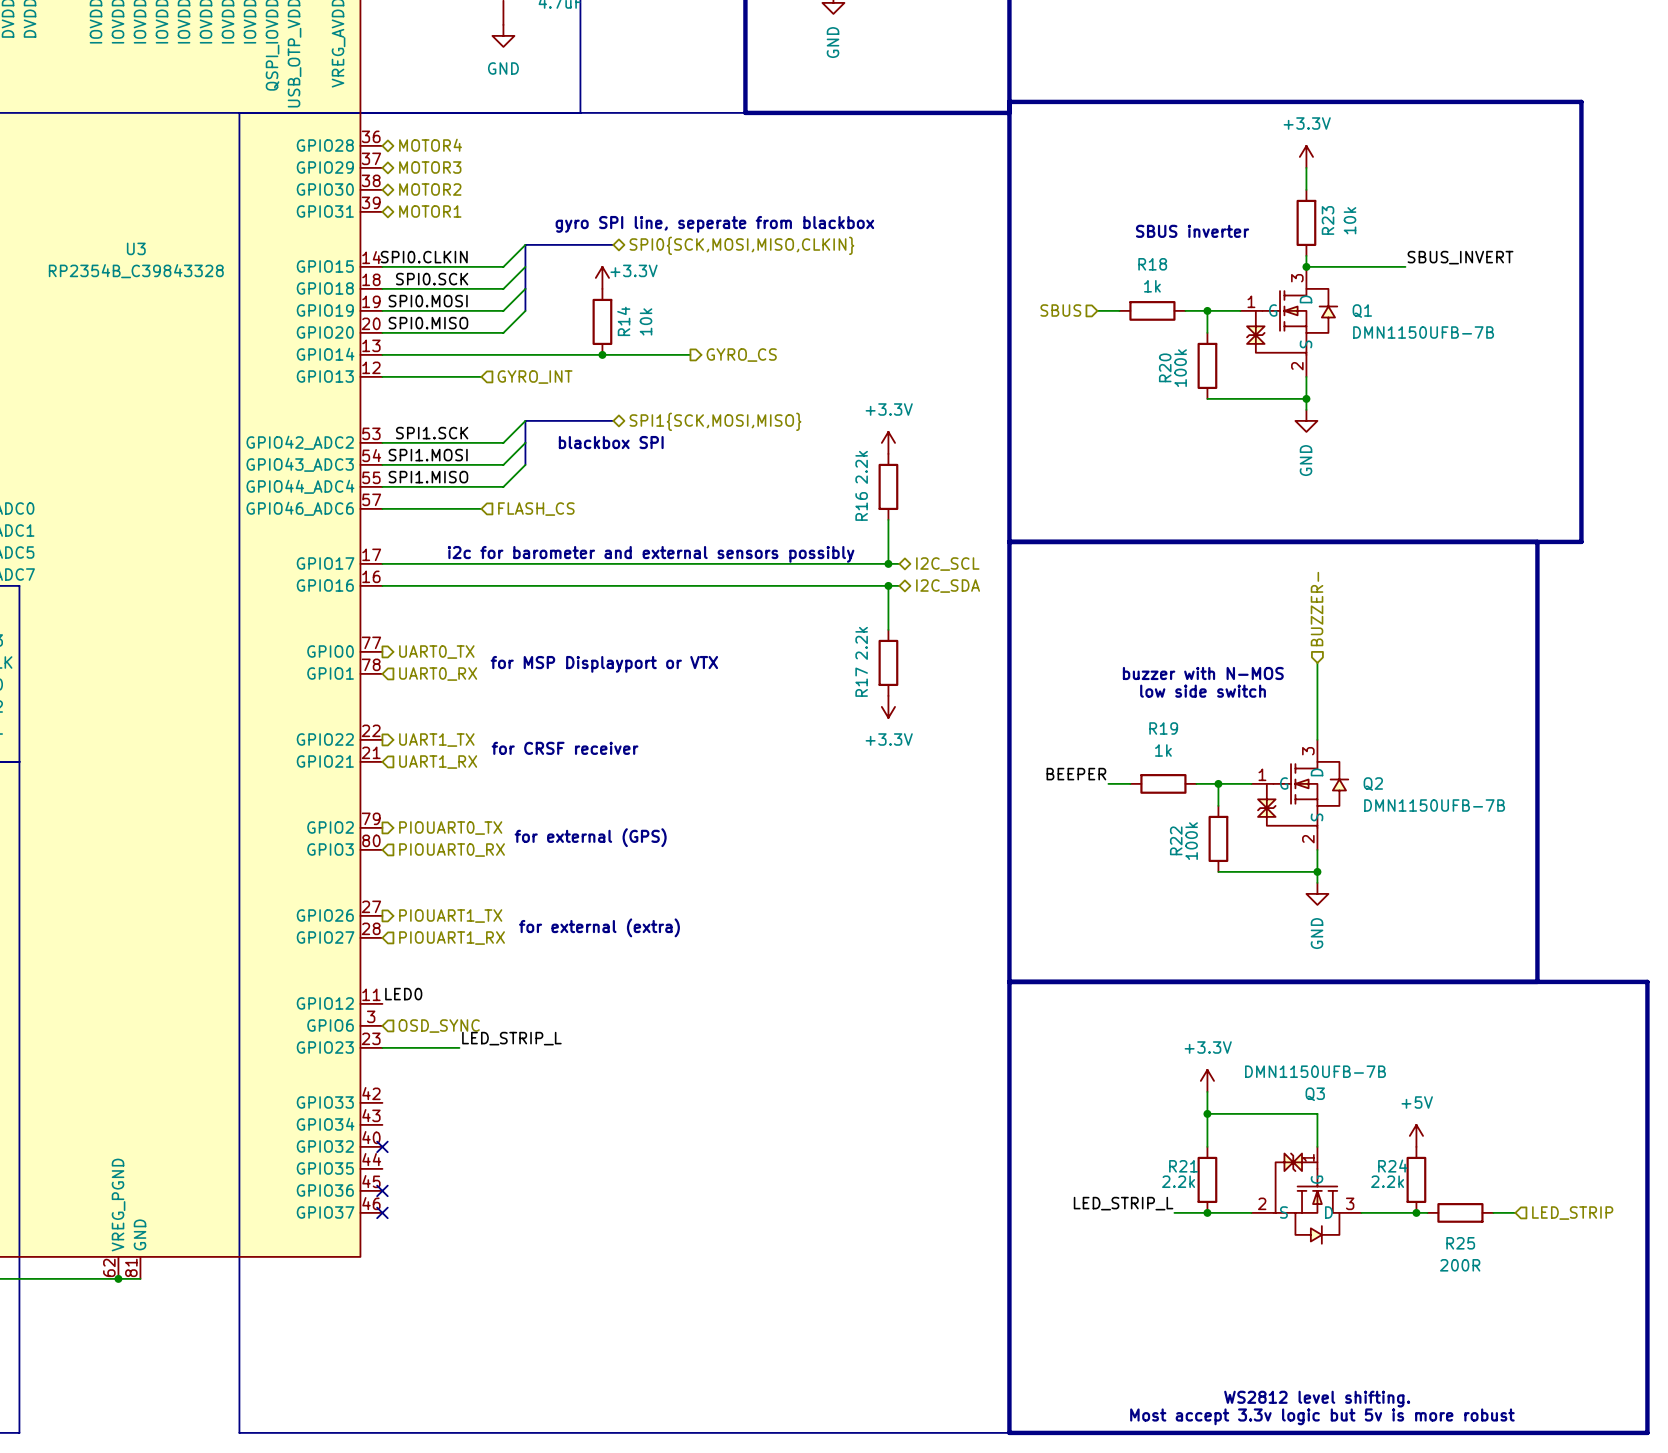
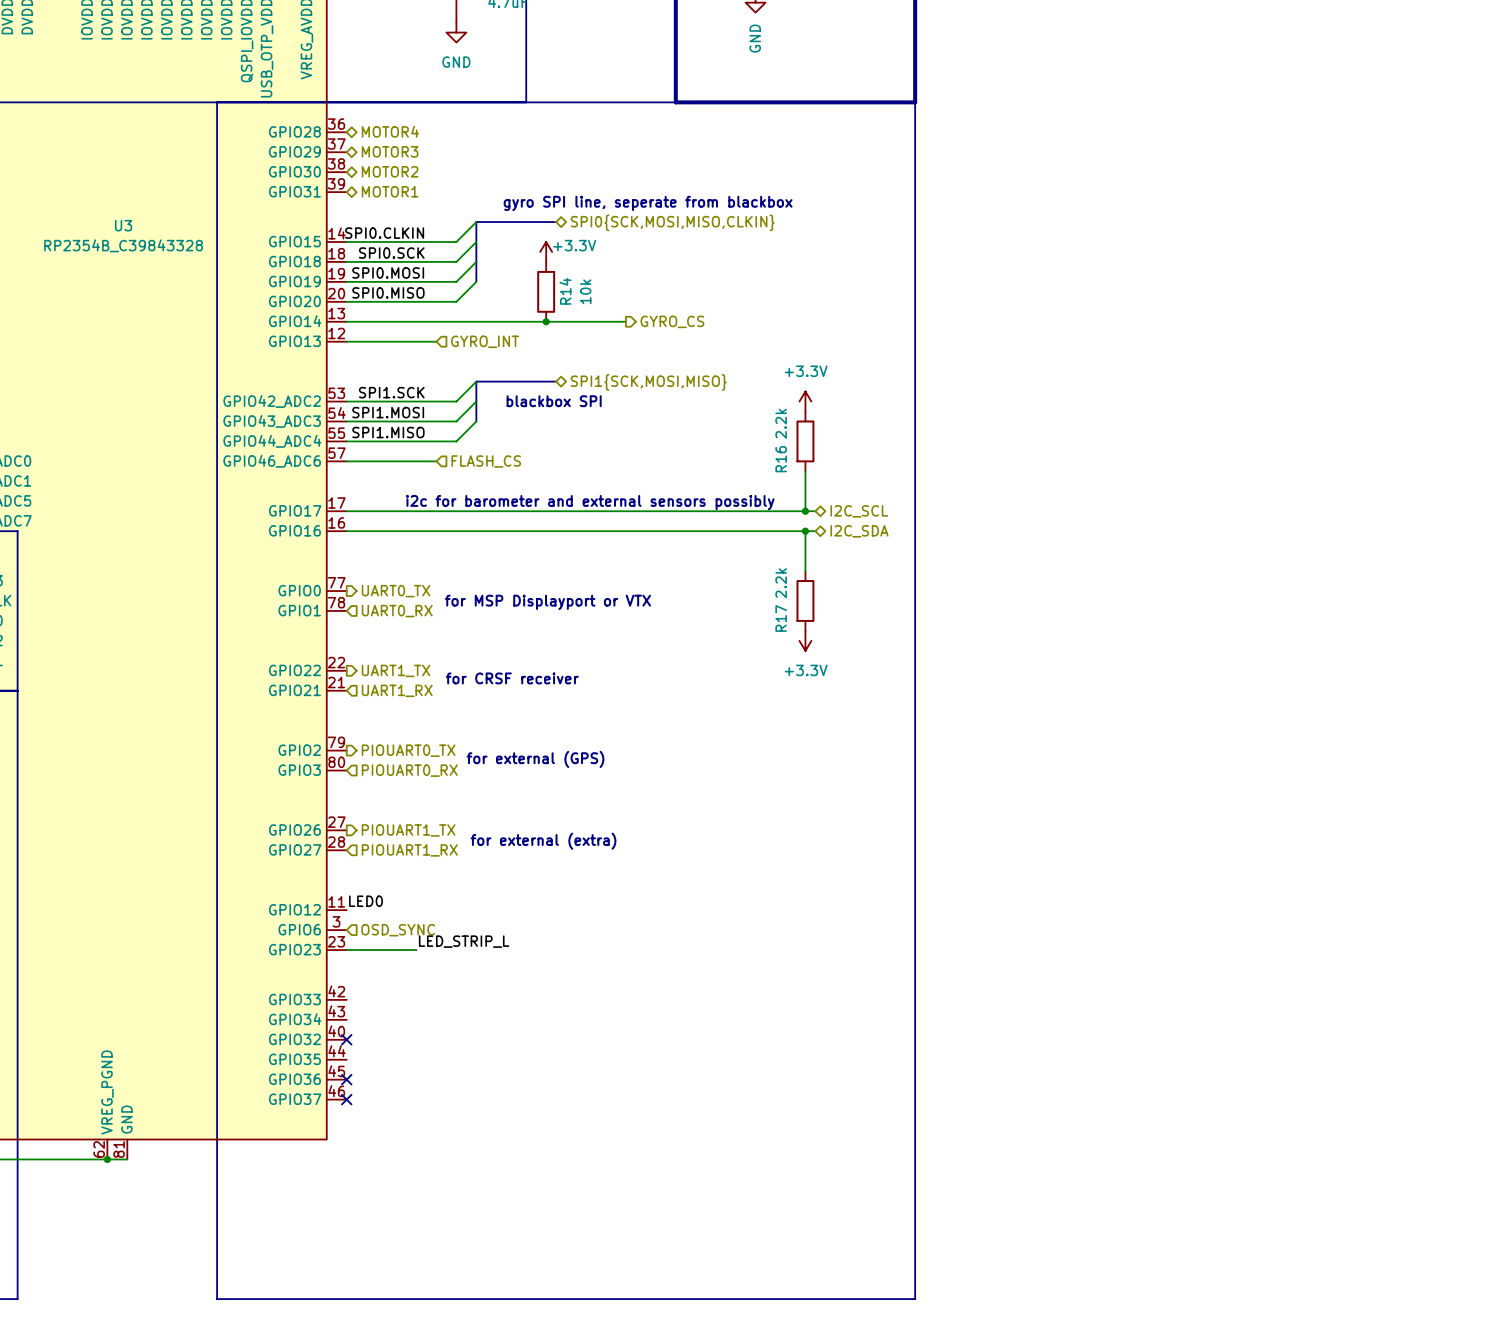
line: (1009, 101) (1581, 101) (1581, 541) (1009, 541) -> none
line: (1009, 112) (1009, 1432) (1647, 1432) (1647, 981) (1009, 981) -> none
power symbol: +3.3V (1306, 156) -> none
wire: (1306, 167) (1306, 189) -> none
R23: 10k (1306, 222) -> none
text: SBUS inverter (1192, 231) -> none
wire: (1306, 255) (1306, 266) (1405, 266) -> none
label: SBUS_INVERT (1460, 257) -> none
junction: (1306, 266) -> none
hierarchical label: SBUS (1060, 310) -> none
wire: (1097, 310) (1119, 310) -> none
R18: 1k (1152, 310) -> none
wire: (1185, 310) (1240, 310) -> none
wire: (1207, 310) (1207, 332) -> none
junction: (1207, 310) -> none
Q1: DMN1150UFB-7B (1288, 321) -> none
R20: 100k (1207, 365) -> none
wire: (1306, 376) (1306, 409) -> none
wire: (1207, 398) (1306, 398) -> none
junction: (1306, 398) -> none
power symbol: GND (1306, 420) -> none
line: (1537, 541) (1537, 981) -> none
hierarchical label: BUZZER- (1317, 609) -> none
wire: (1317, 662) (1317, 739) -> none
text: buzzer with N-MOS (1203, 673) -> none
text: low side switch (1203, 691) -> none
label: BEEPER (1076, 774) -> none
wire: (1108, 783) (1130, 783) -> none
R19: 1k (1163, 783) -> none
wire: (1196, 783) (1251, 783) -> none
wire: (1218, 783) (1218, 805) -> none
junction: (1218, 783) -> none
Q2: DMN1150UFB-7B (1299, 794) -> none
R22: 100k (1218, 838) -> none
wire: (1317, 849) (1317, 882) -> none
wire: (1218, 871) (1317, 871) -> none
junction: (1317, 871) -> none
power symbol: GND (1317, 893) -> none
power symbol: +3.3V (1207, 1080) -> none
wire: (1207, 1091) (1207, 1146) -> none
wire: (1207, 1113) (1317, 1113) (1317, 1146) -> none
junction: (1207, 1113) -> none
power symbol: +5V (1416, 1135) -> none
R21: 2.2k (1207, 1179) -> none
R24: 2.2k (1416, 1179) -> none
Q3: DMN1150UFB-7B (1306, 1195) -> none
label: LED_STRIP_L (1123, 1203) -> none
wire: (1174, 1212) (1251, 1212) -> none
junction: (1207, 1212) -> none
wire: (1361, 1212) (1427, 1212) -> none
junction: (1416, 1212) -> none
R25: 200R (1460, 1212) -> none
wire: (1493, 1212) (1515, 1212) -> none
hierarchical label: LED_STRIP (1572, 1213) -> none
text: WS2812 level shifting. (1317, 1399) -> none
text: Most accept 3.3v logic but 5v is more robust (1322, 1416) -> none

